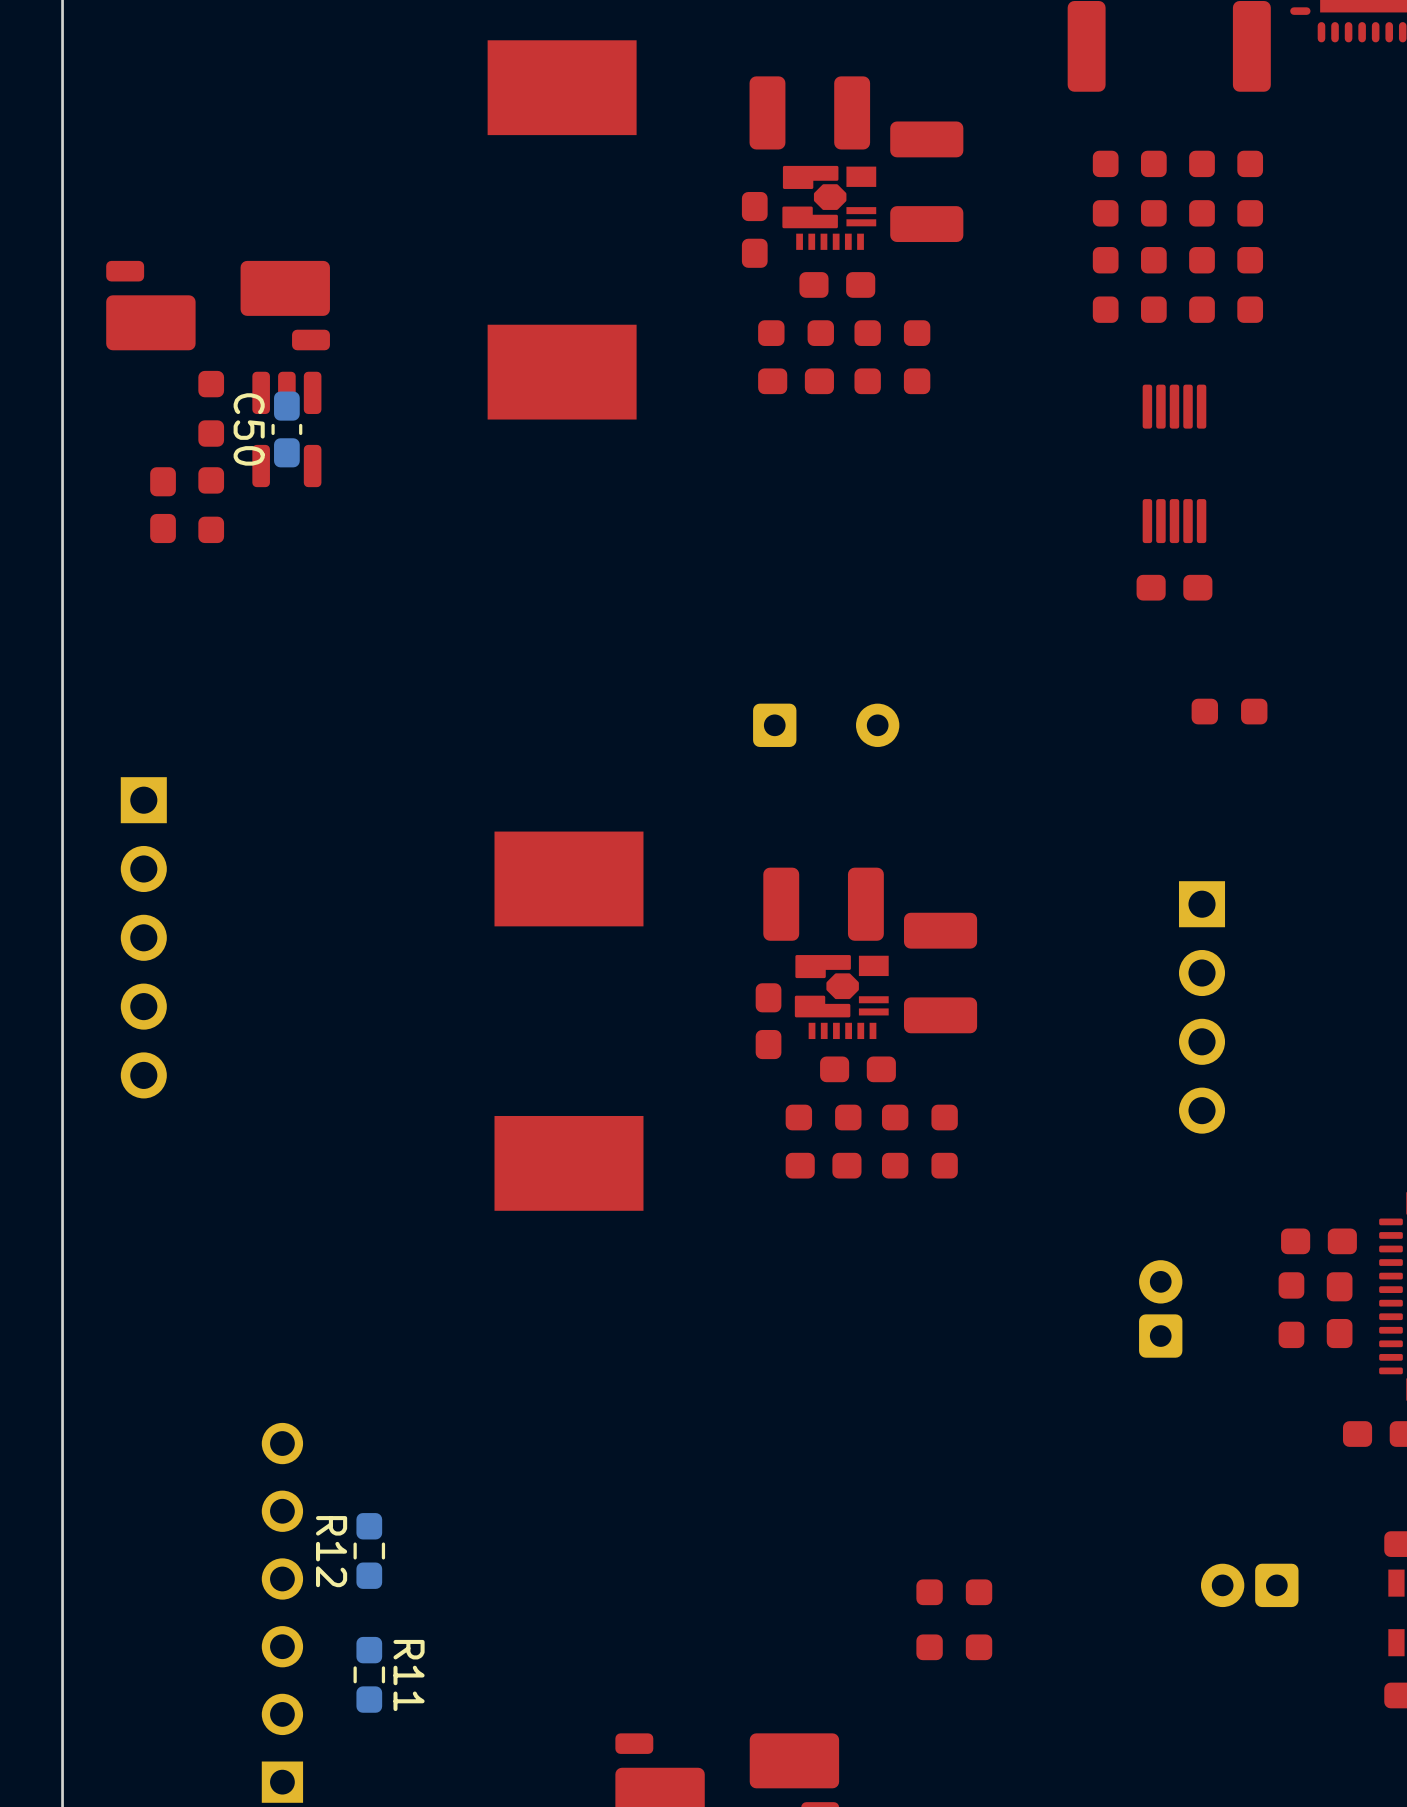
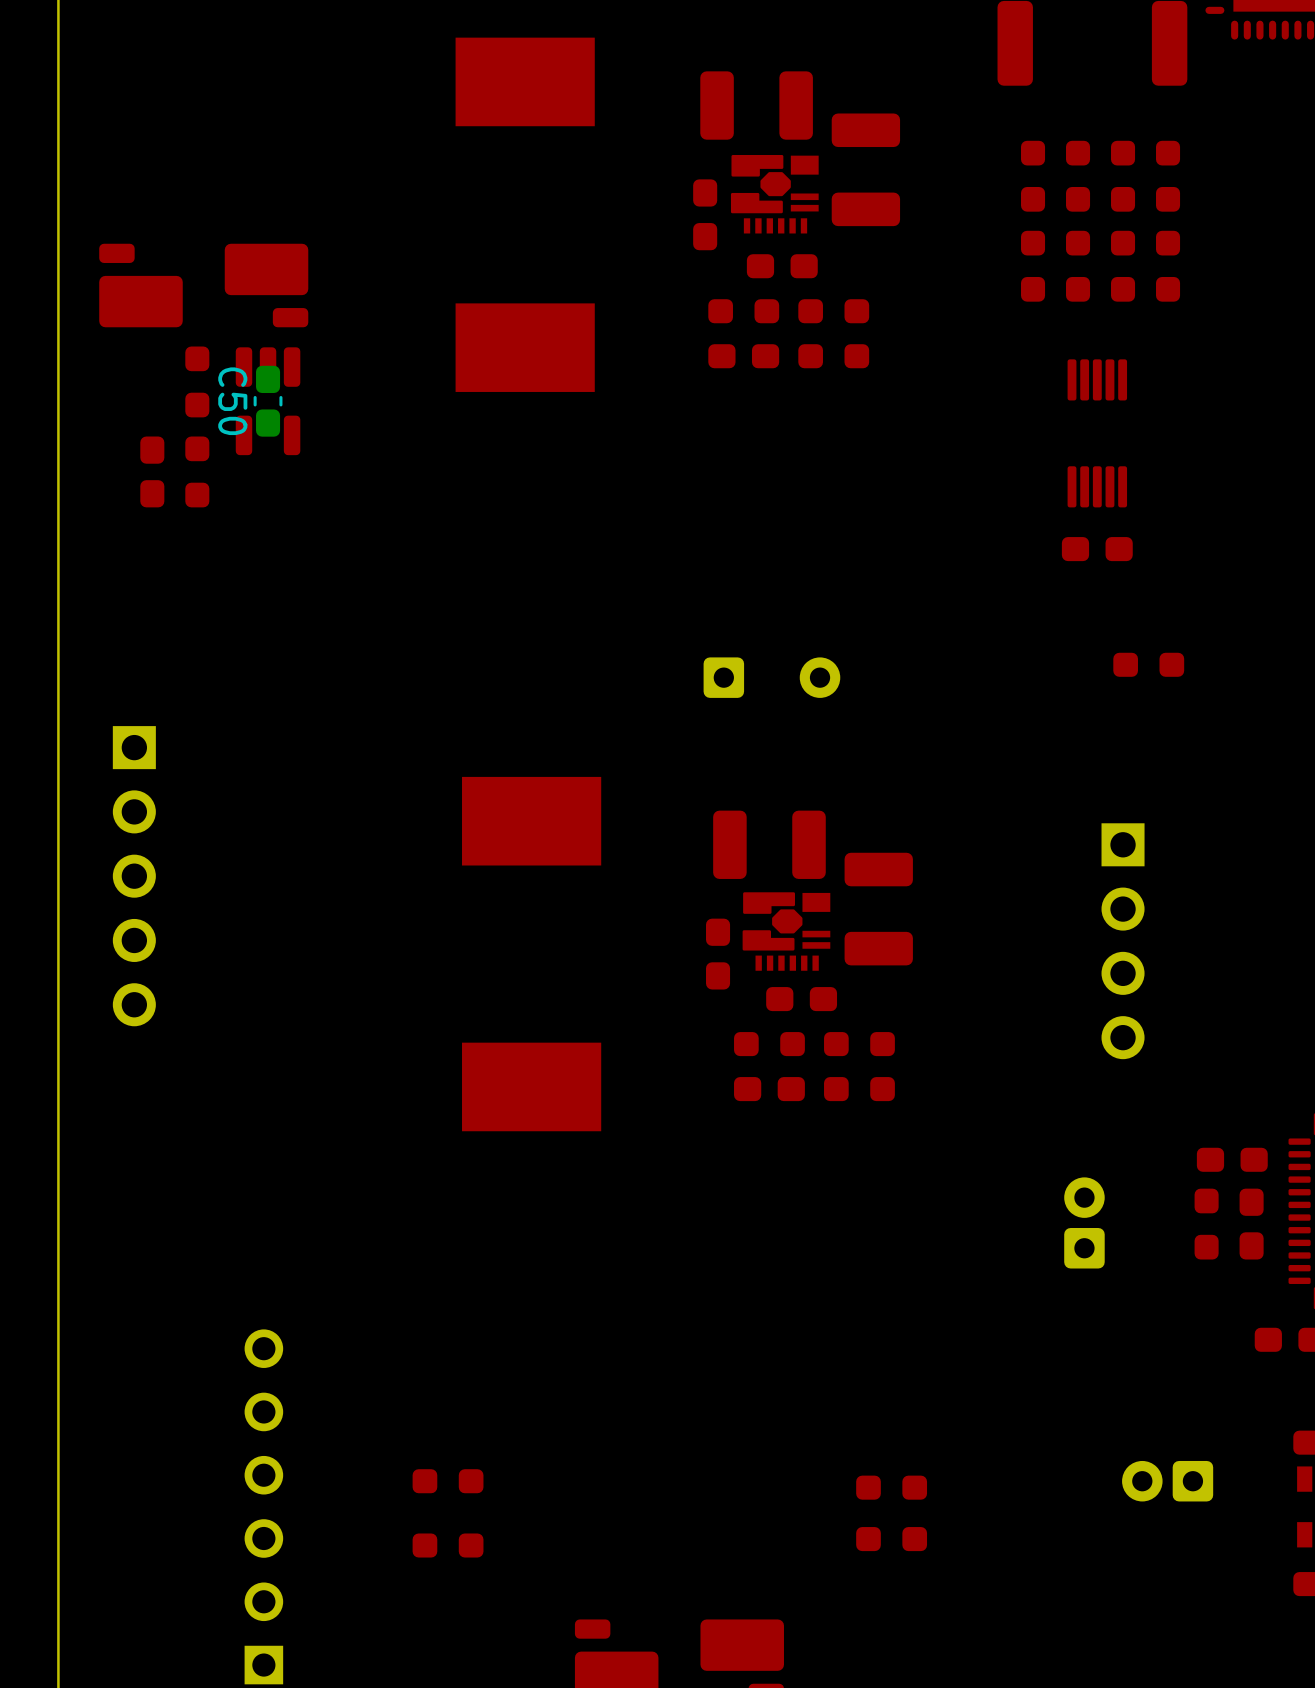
R12 side: bottom (369, 1550) -> top (448, 1481)
R11 side: bottom (369, 1674) -> top (448, 1545)

